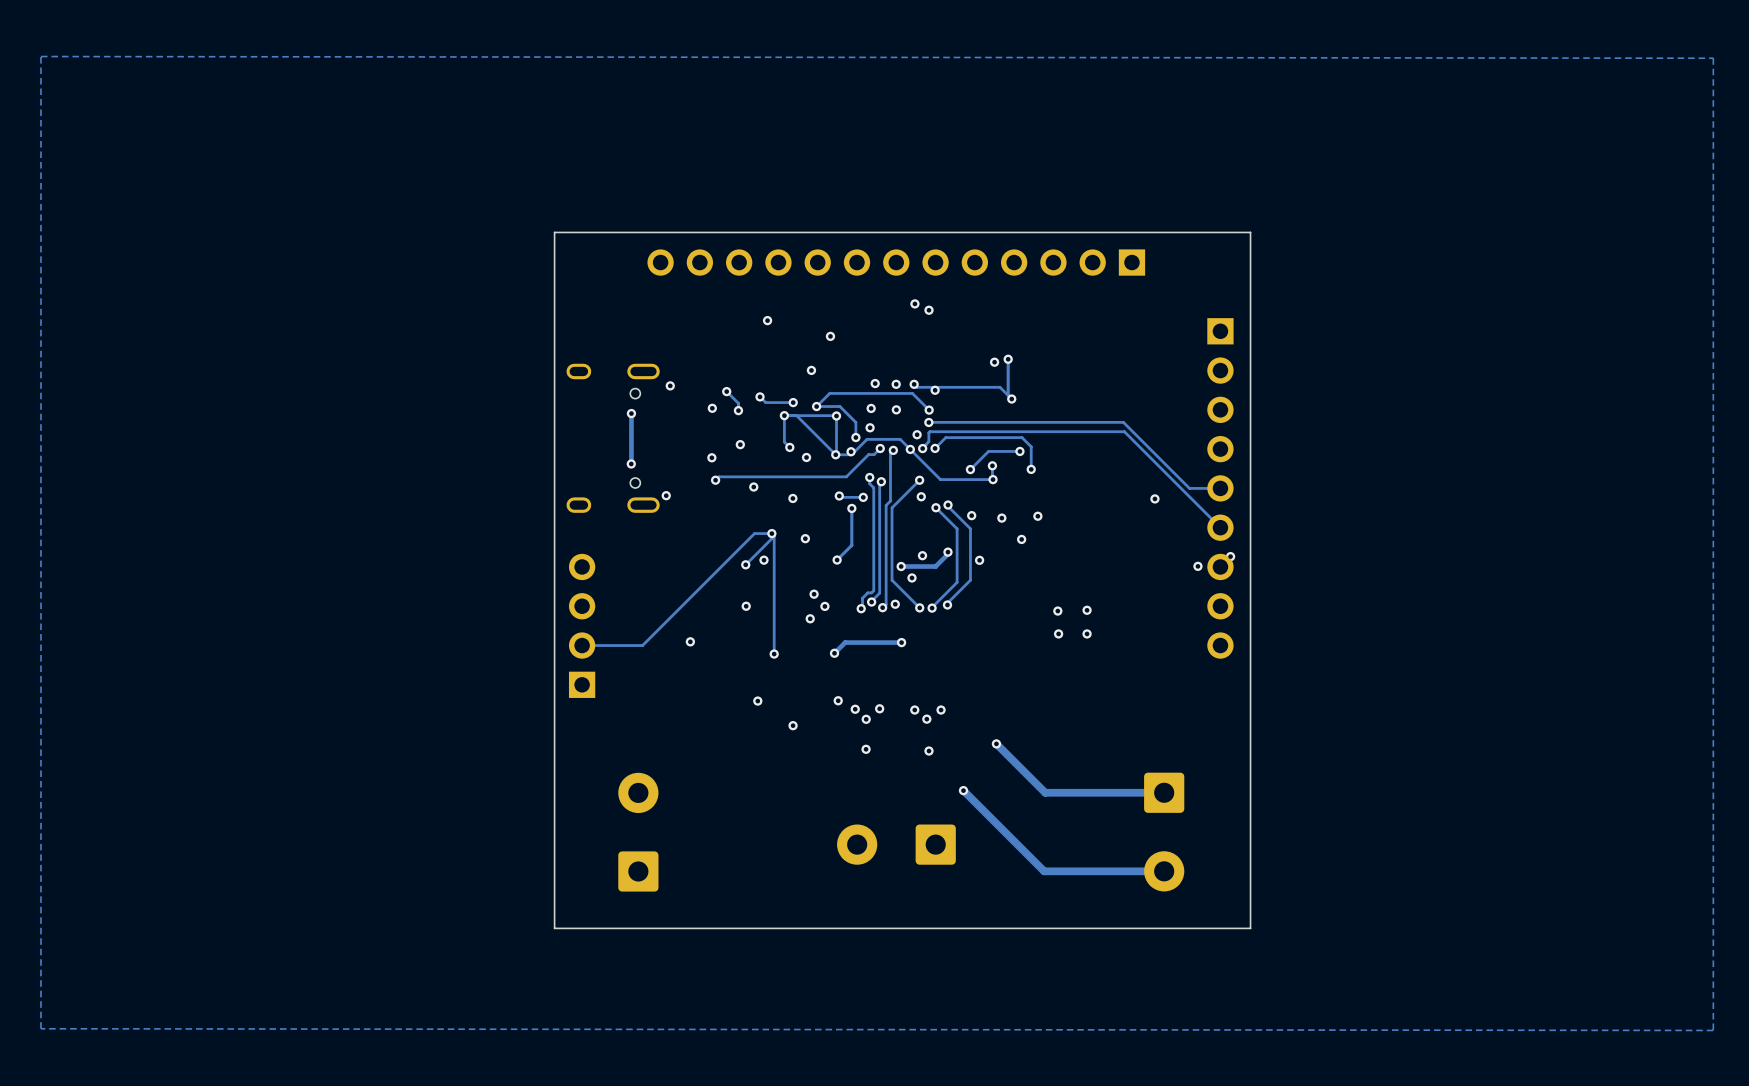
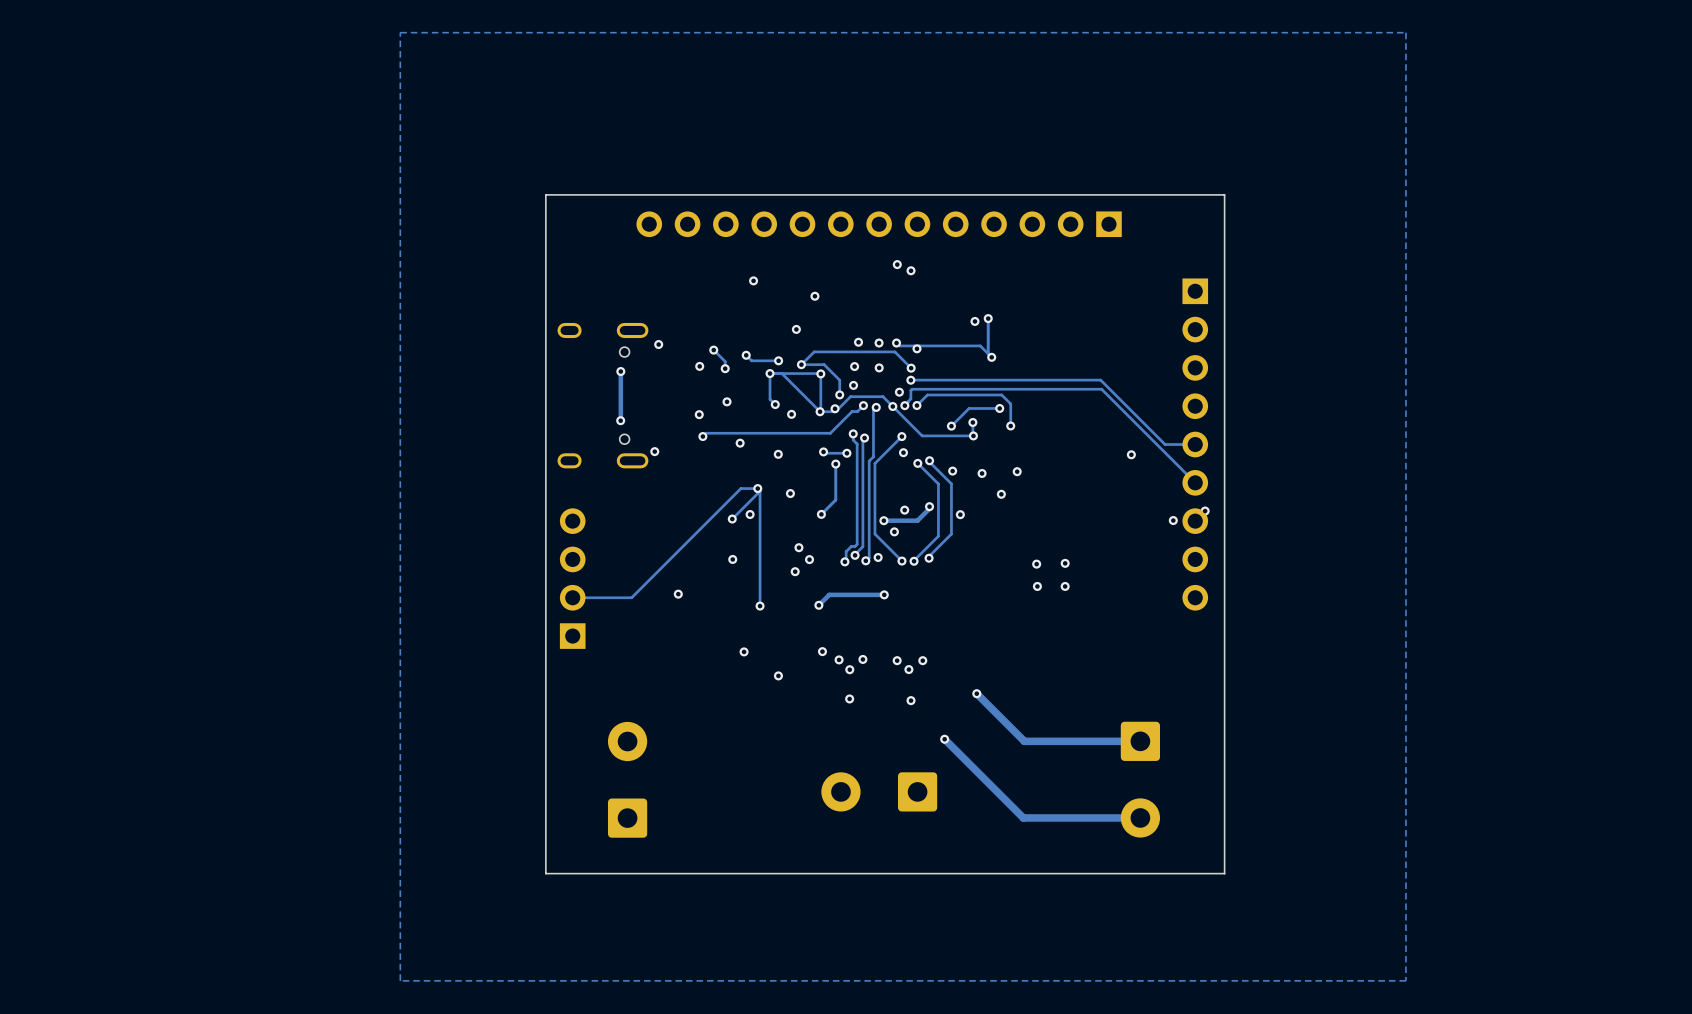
zone outline: (40, 56) (40, 1028) (1713, 1030) (1713, 58) (40, 56) -> (1405, 32) (1405, 980) (400, 980) (400, 32) (1405, 32)

